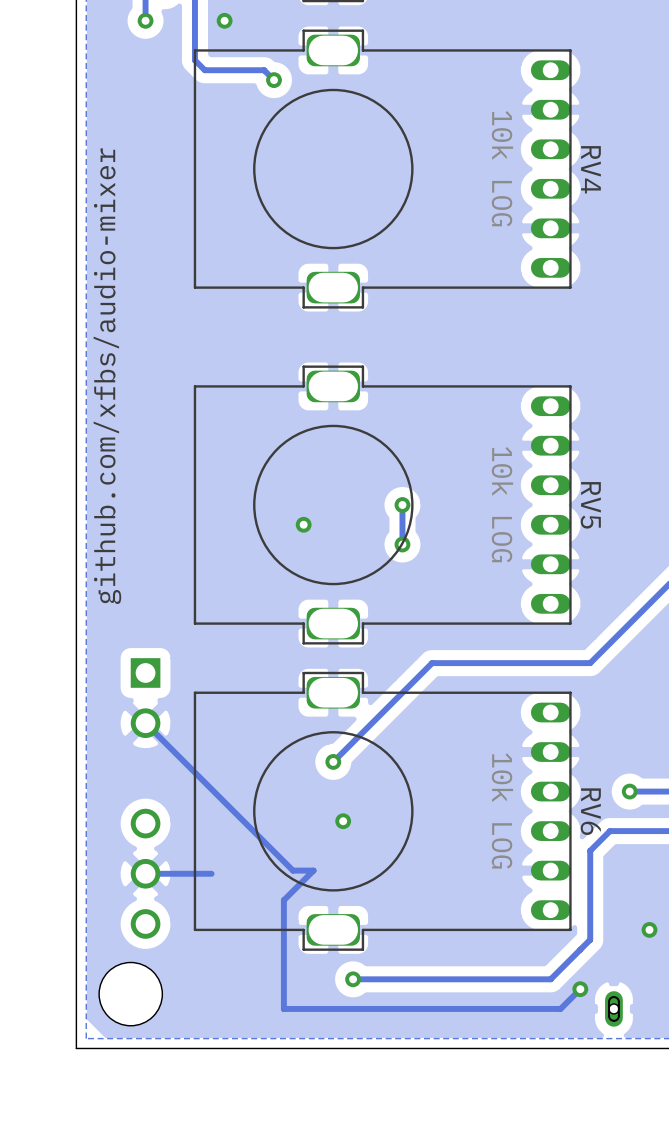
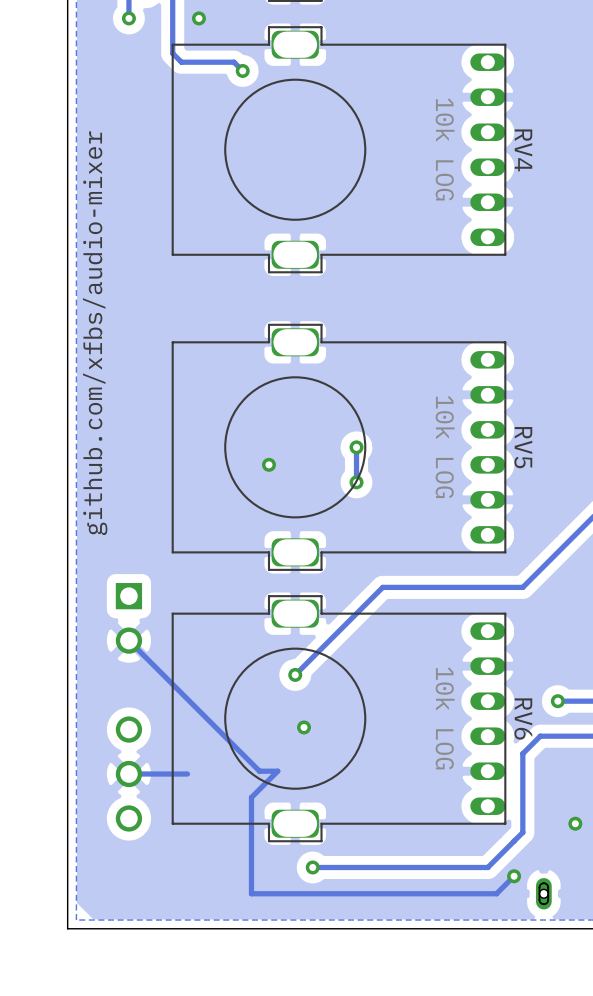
part: (130, 994) -> none

